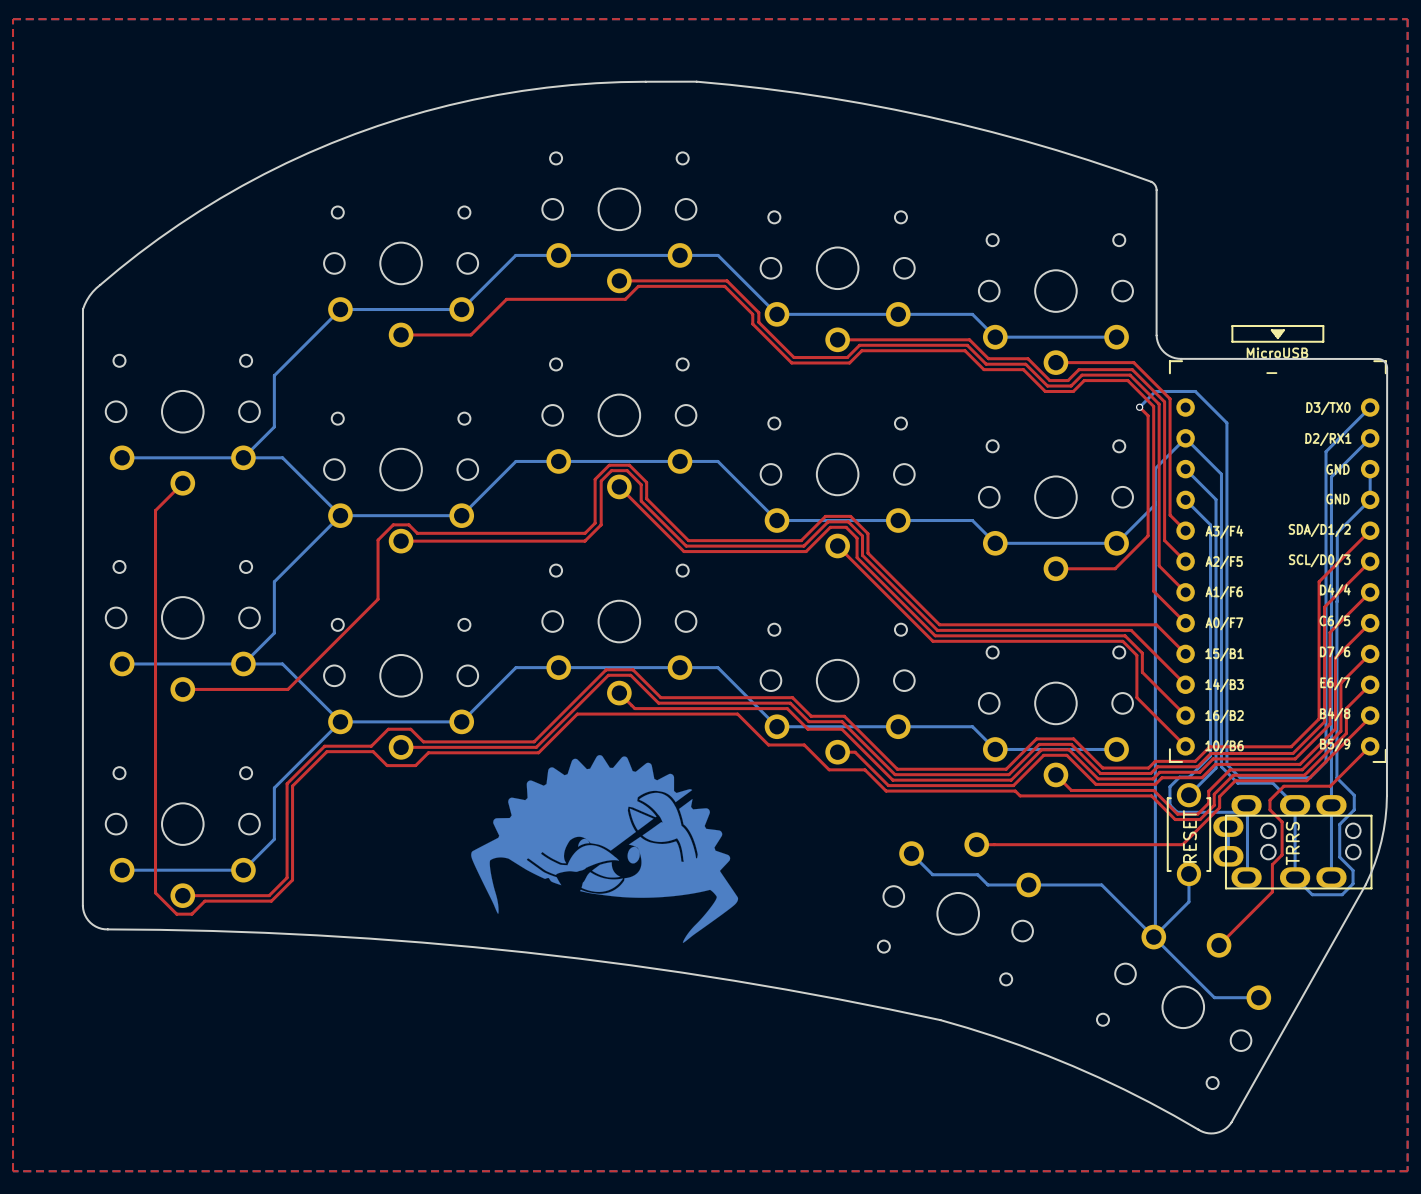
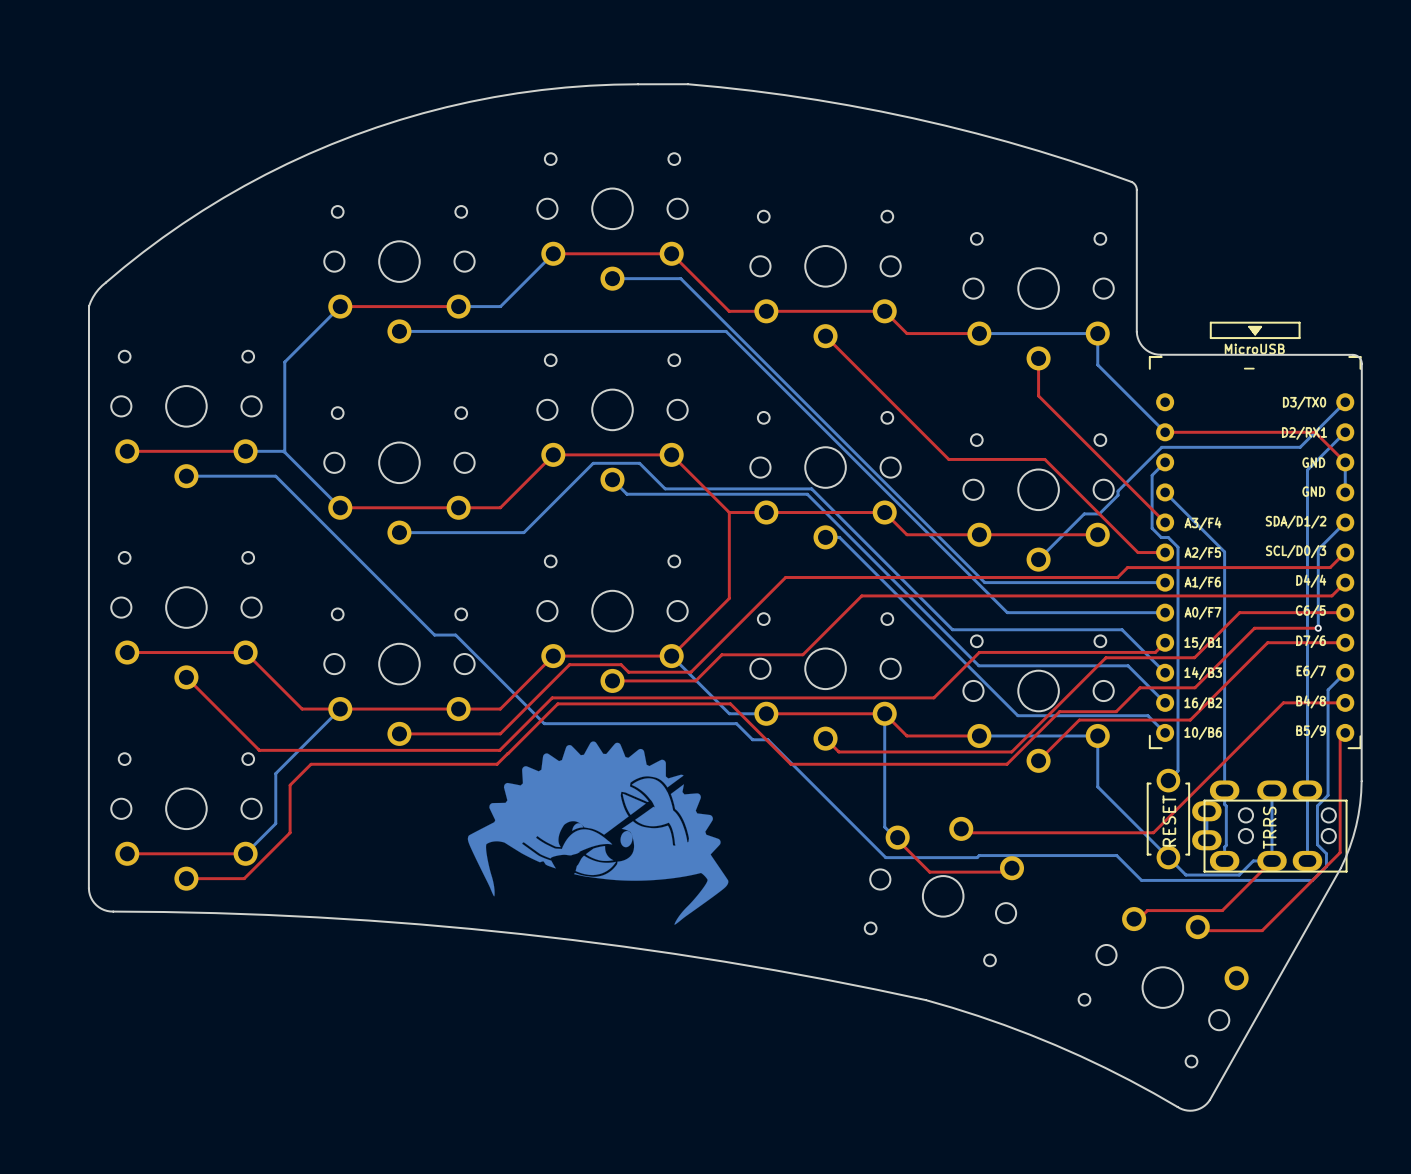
top zone outline: (13, 19) (13, 1171) (1407, 1171) (1407, 19) (13, 19) -> none
top track: none -> (553, 253) (671, 253) (729, 311) (884, 311) (906, 333) (979, 333)
bottom track: none -> (553, 253) (500, 306) (458, 306)
top track: (619, 280) (727, 280) (758, 312) (758, 322) (794, 357) (847, 357) (859, 345) (967, 345) (986, 364) (1025, 364) (1047, 386) (1071, 386) (1082, 375) (1130, 375) (1159, 404) (1159, 565) (1185, 592) -> none
bottom track: none -> (612, 278) (680, 278) (984, 582) (1165, 582)
top track: none -> (340, 306) (458, 306)
bottom track: (340, 309) (274, 375) (274, 426) (243, 457) (122, 457) -> (340, 306) (284, 362) (284, 452)
bottom track: (340, 309) (461, 309) (515, 255) (718, 255) (777, 314) (972, 314) (995, 337) -> none
top track: (401, 334) (470, 334) (506, 299) (625, 299) (638, 286) (724, 286) (752, 314) (752, 324) (791, 362) (849, 362) (861, 350) (965, 350) (983, 369) (1023, 369) (1045, 391) (1073, 391) (1084, 380) (1127, 380) (1153, 406) (1153, 591) (1185, 623) -> none
bottom track: none -> (399, 331) (726, 331) (1007, 612) (1165, 612)
bottom track: none -> (1097, 333) (1097, 364) (1165, 432)
top track: (837, 339) (969, 339) (988, 358) (1027, 358) (1049, 380) (1068, 380) (1078, 369) (1132, 369) (1164, 401) (1164, 540) (1185, 561) -> (825, 336) (948, 459) (1044, 459) (1137, 552) (1165, 552)
top track: (1055, 362) (1133, 362) (1170, 398) (1170, 515) -> (1038, 358) (1038, 395) (1149, 507)
top track: (1139, 407) (1148, 415) (1148, 535) (1115, 568) (1055, 568) -> none
bottom track: (1139, 407) (1155, 391) (1195, 391) (1226, 423) (1226, 764) (1240, 777) (1310, 777) (1326, 761) (1326, 451) -> (1038, 559) (1084, 513) (1099, 513) (1118, 495) (1118, 491) (1161, 447) (1300, 447) (1302, 445)
via: (1139, 407) -> none
top track: none -> (1165, 432) (1315, 432) (1345, 462)
top track: none -> (127, 451) (245, 451)
bottom track: (1185, 469) (1216, 499) (1216, 768) (1198, 785) -> (1165, 462) (1152, 475) (1152, 528) (1161, 537) (1168, 537) (1178, 547) (1178, 770)
top track: (182, 483) (155, 510) (155, 892) (176, 914) (191, 914) (204, 901) (271, 901) (292, 880) (292, 786) (326, 751) (373, 751) (387, 765) (415, 765) (428, 752) (538, 752) (577, 714) (737, 714) (768, 744) (804, 744) (829, 769) (864, 769) (886, 791) (1015, 791) (1020, 795) (1151, 795) (1175, 819) (1200, 819) (1214, 805) (1214, 794) (1233, 775) (1304, 775) (1346, 733) (1346, 708) (1370, 684) -> none
bottom track: none -> (186, 476) (275, 476) (434, 635) (455, 635) (544, 723) (736, 723) (752, 739) (767, 739) (885, 857) (1116, 855) (1141, 880) (1312, 880) (1326, 866) (1326, 853) (1317, 844) (1317, 805) (1328, 795) (1328, 689) (1345, 672)
top track: (619, 486) (684, 551) (806, 551) (830, 527) (846, 527) (857, 538) (857, 557) (935, 635) (1125, 635) (1142, 653) (1142, 672) (1185, 715) -> none
bottom track: none -> (612, 479) (627, 494) (807, 494) (978, 665) (1128, 665) (1165, 702)
bottom track: (1370, 499) (1337, 532) (1336, 777) (1354, 795) (1354, 809) (1339, 824) (1339, 857) (1353, 870) (1353, 883) (1342, 894) (1312, 894) (1295, 877) -> (1097, 735) (1097, 786) (1185, 875) (1239, 875) (1253, 860) (1271, 860)
bottom track: (1155, 504) (1116, 543) (995, 543) (972, 520) (777, 520) (717, 461) (515, 461) (461, 515) (340, 515) -> none
top track: none -> (340, 507) (500, 507) (553, 454) (671, 454) (729, 512)
bottom track: (340, 515) (274, 581) (274, 633) (243, 664) -> none
top track: none -> (729, 512) (729, 598) (671, 656) (553, 656) (500, 709) (302, 709) (245, 652) (127, 652)
top track: none -> (729, 512) (884, 512) (906, 534) (1097, 534)
bottom track: (1210, 524) (1210, 755) (1189, 777) (1179, 777) (1169, 786) (1169, 805) (1177, 812) (1239, 812) (1246, 805) (1246, 877) -> (1189, 516) (1224, 551) (1224, 804) (1226, 806) (1224, 860)
top track: (1370, 530) (1319, 581) (1319, 718) (1291, 746) (1209, 746) (1195, 761) (1155, 761) (1148, 768) (1102, 768) (1073, 738) (1036, 738) (1006, 769) (897, 769) (844, 716) (811, 716) (792, 697) (660, 697) (632, 669) (606, 669) (534, 741) (423, 741) (410, 729) (388, 729) (371, 746) (324, 746) (287, 783) (287, 877) (269, 895) (242, 895) -> (1318, 628) (1254, 628) (1194, 687) (1140, 687) (1116, 711) (1059, 711) (1007, 764) (790, 764) (730, 703) (557, 703) (497, 764) (311, 764) (290, 785) (290, 832) (244, 878)
bottom track: none -> (1345, 522) (1318, 549) (1318, 628)
top track: (401, 541) (584, 541) (601, 524) (601, 481) (611, 470) (627, 470) (641, 484) (641, 501) (686, 546) (803, 546) (828, 521) (848, 521) (862, 535) (862, 555) (937, 630) (1131, 630) (1185, 684) -> none
bottom track: none -> (399, 532) (523, 532) (593, 463) (639, 463) (665, 488) (811, 488) (952, 629) (1122, 629) (1165, 672)
top track: (837, 545) (932, 641) (1122, 641) (1136, 655) (1136, 697) (1185, 746) -> none
bottom track: none -> (825, 537) (839, 537) (1017, 715) (1147, 715) (1165, 732)
top track: (1354, 576) (1324, 607) (1324, 721) (1293, 753) (1210, 753) (1197, 766) (1157, 766) (1150, 773) (1100, 773) (1071, 744) (1039, 744) (1008, 774) (895, 774) (842, 721) (808, 721) (790, 703) (658, 703) (630, 675) (608, 675) (536, 747) (504, 747) -> (1330, 567) (1127, 567) (1117, 577) (785, 577) (690, 672) (628, 672) (621, 664) (569, 664) (500, 733)
top track: (1356, 605) (1330, 632) (1330, 724) (1295, 758) (1213, 758) (1199, 772) (1159, 772) (1153, 778) (1098, 778) (1069, 749) (1041, 749) (1011, 780) (892, 780) (841, 729) (807, 729) (787, 708) (634, 708) (619, 693) -> (1331, 595) (861, 595) (802, 654) (721, 654) (695, 680) (612, 680)
top track: (1370, 623) (1335, 657) (1335, 728) (1300, 764) (1215, 764) (1202, 777) (1162, 777) (1155, 784) (1095, 784) (1066, 755) (1043, 755) (1013, 785) (888, 785) (855, 752) (837, 752) -> (1345, 612) (1239, 612) (1194, 657) (1105, 657) (1011, 751) (838, 751) (825, 738)
via: none -> (1318, 628)
top track: (1185, 653) (1156, 624) (939, 624) (867, 553) (867, 533) (850, 516) (825, 516) (801, 540) (688, 540) (646, 498) (646, 482) (629, 465) (609, 465) (595, 479) (595, 523) (585, 533) (417, 533) (408, 524) (393, 524) (378, 540) (378, 599) (287, 689) (182, 689) -> (1165, 642) (1155, 652) (979, 652) (933, 697) (552, 697) (499, 750) (259, 750) (186, 677)
top track: (1370, 653) (1340, 683) (1340, 731) (1302, 769) (1230, 769) (1208, 791) (1208, 803) (1197, 814) (1177, 814) (1153, 790) (1071, 790) (1055, 774) -> (1345, 642) (1267, 642) (1190, 720) (1079, 720) (1038, 760)
bottom track: (122, 663) (282, 663) (340, 721) (461, 721) (515, 667) (717, 667) (777, 726) (972, 726) (995, 749) -> none
bottom track: none -> (671, 656) (729, 713) (766, 713)
top track: (1370, 715) (1306, 780) (1235, 780) (1219, 796) (1219, 807) (1182, 844) (976, 844) -> (1345, 702) (1283, 702) (1153, 832) (962, 832)
top track: none -> (766, 713) (884, 713) (906, 735) (979, 735)
bottom track: none -> (884, 713) (884, 827) (899, 841)
top track: (1364, 751) (1330, 786) (1283, 786) (1269, 800) (1269, 809) (1282, 821) (1282, 854) (1272, 864) (1272, 891) (1219, 945) -> (1340, 738) (1340, 852) (1262, 930) (1199, 930)
bottom track: (1295, 805) (1272, 783) (1237, 783) (1221, 766) (1221, 474) (1185, 438) (1155, 468) (1155, 935) -> none
bottom track: (911, 853) (932, 874) (977, 874) (987, 884) (1101, 884) (1214, 997) (1258, 997) -> none
top track: none -> (899, 841) (929, 872) (1013, 872)
top track: none -> (127, 853) (245, 853)
bottom track: (122, 870) (243, 870) -> none
bottom track: (1188, 874) (1188, 901) (1153, 937) -> none
top track: none -> (1271, 860) (1222, 910) (1147, 910) (1135, 922)

